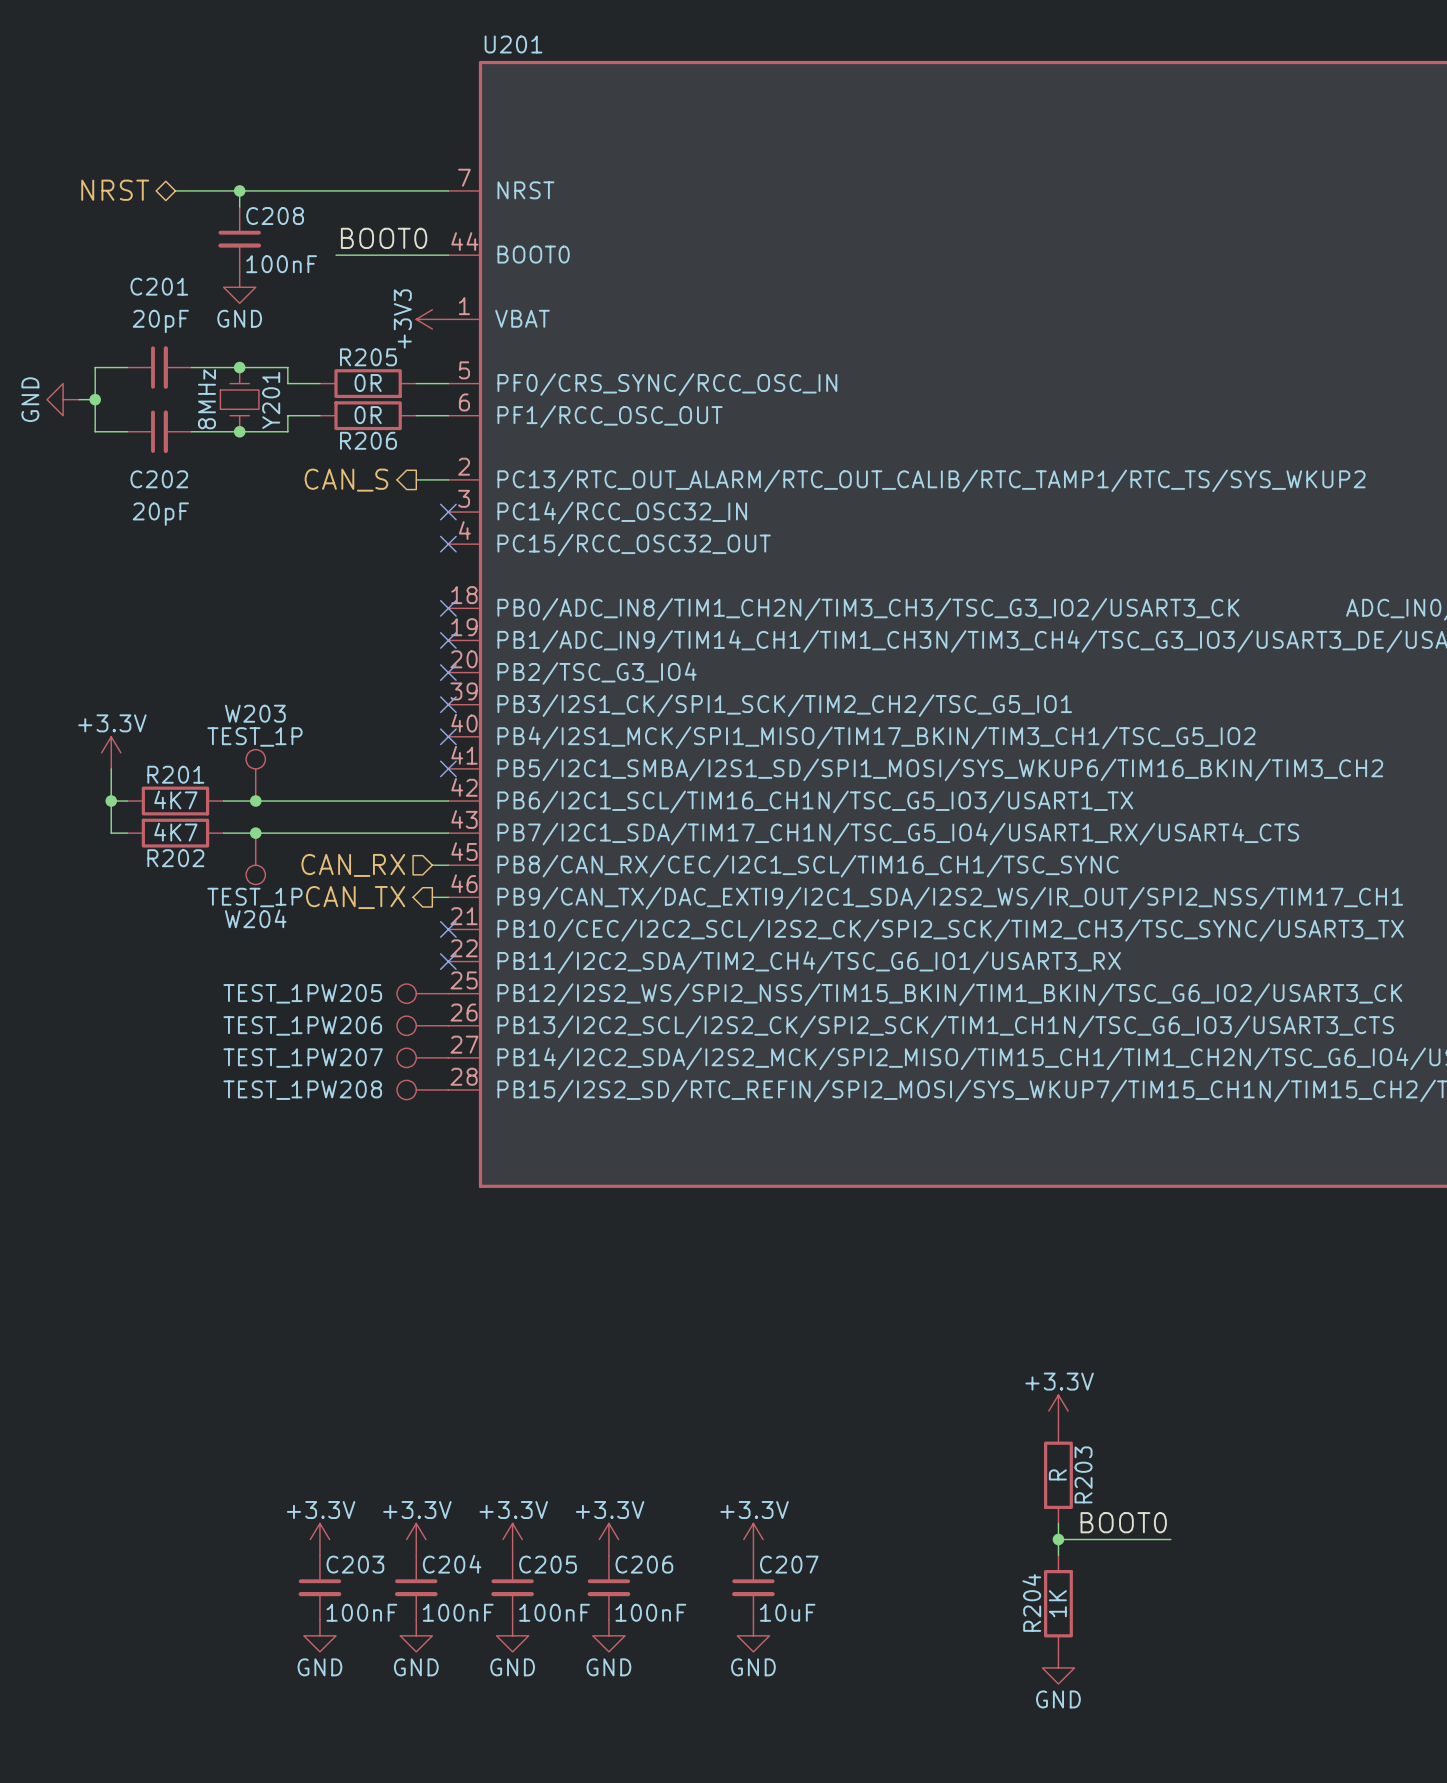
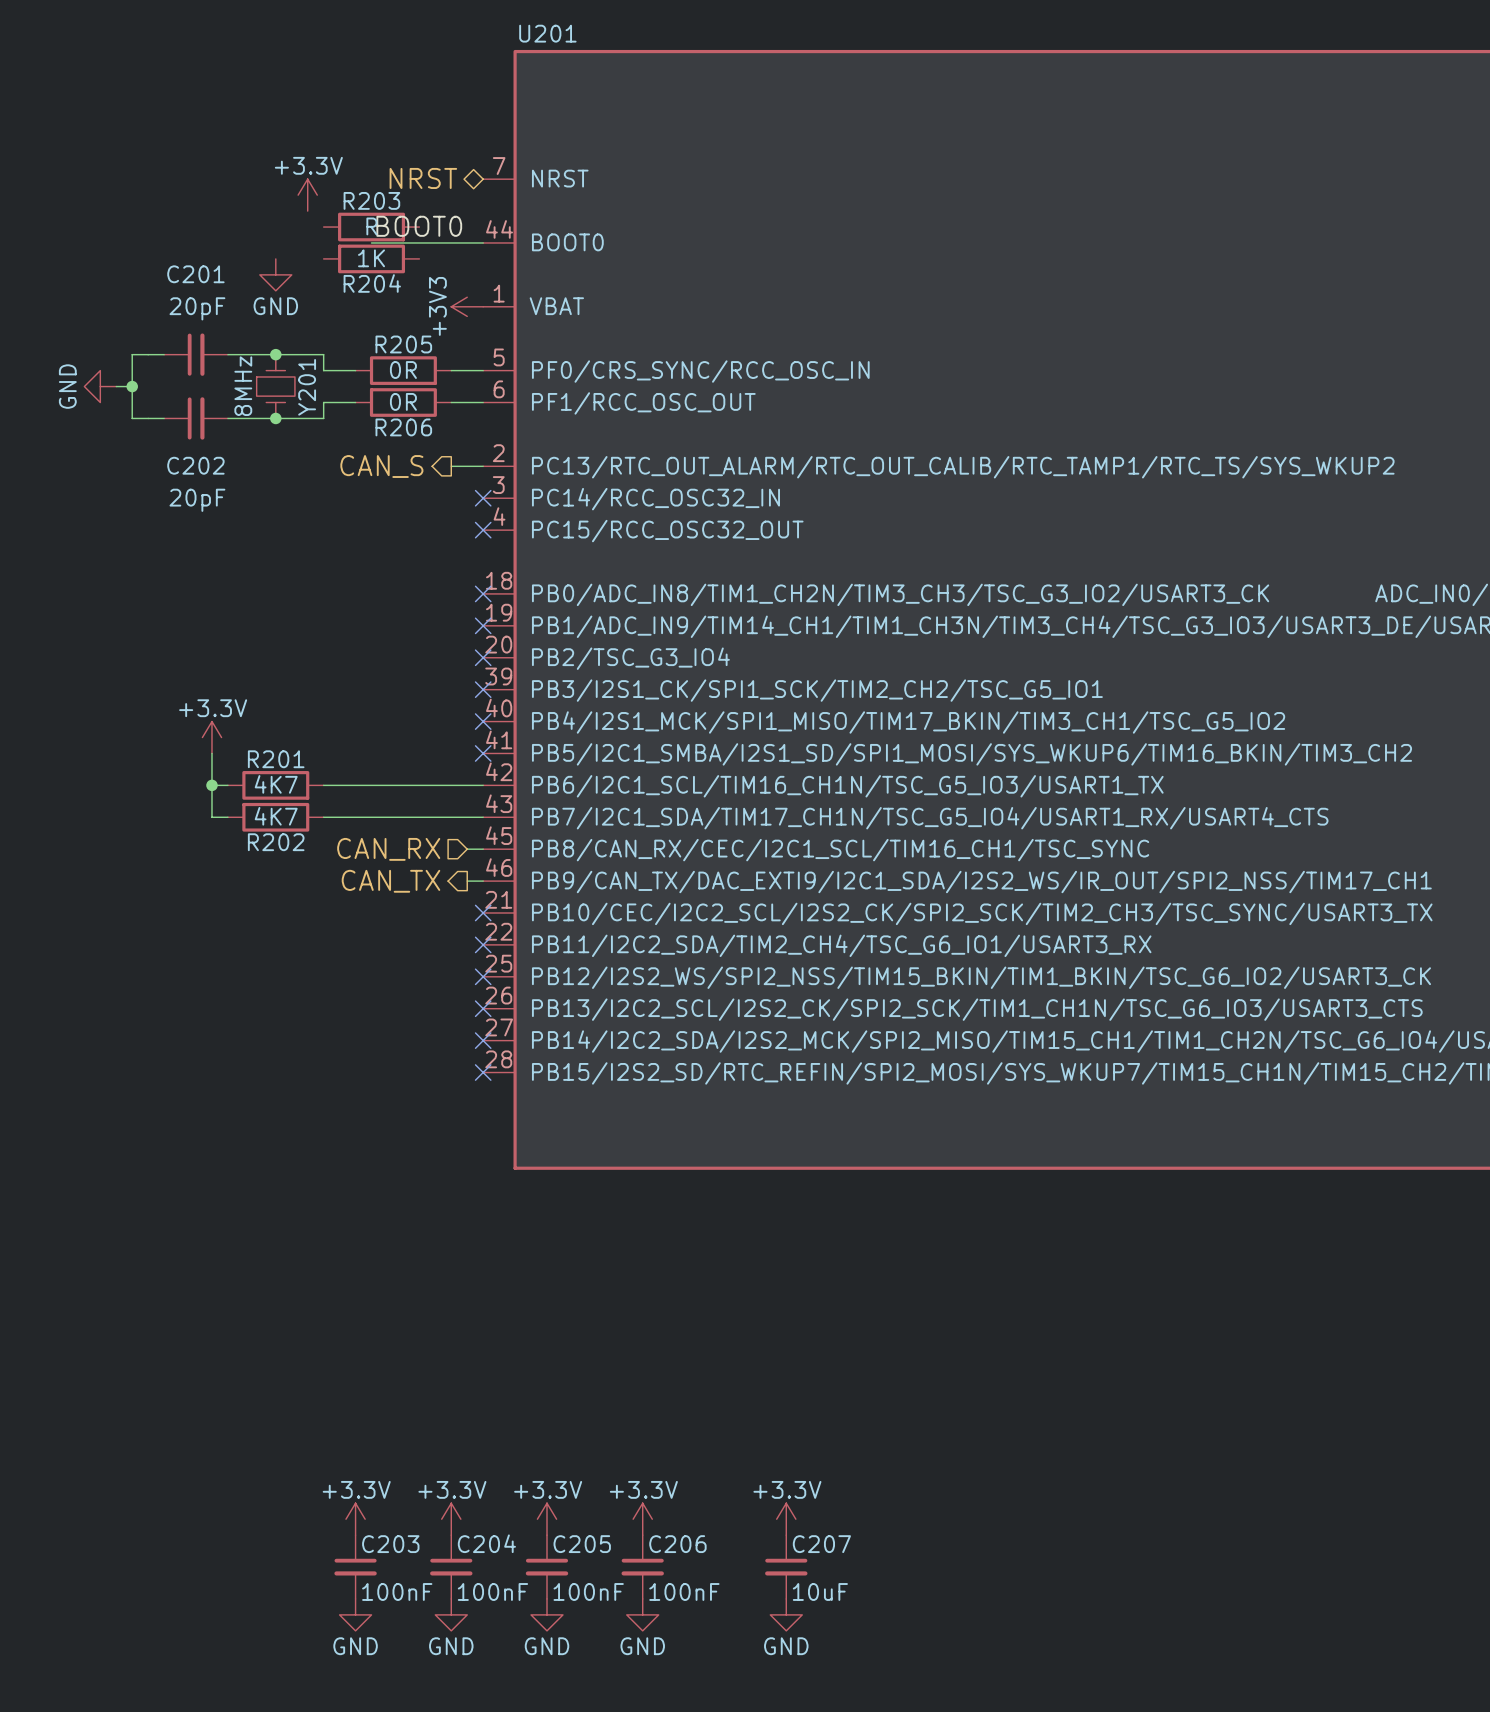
hierarchical label position: NRST (115, 190) -> NRST (423, 178)
wire: (175, 190) (448, 190) -> none
wire: (239, 190) (239, 207) -> none
junction: (239, 190) -> none
power symbol: none -> +3.3V (307, 195)
C208: 100nF (239, 239) -> none
power symbol position: +3.3V (111, 752) -> +3.3V (211, 737)
wire: (111, 768) (111, 833) (127, 833) -> (211, 753) (211, 817) (227, 817)
W203: TEST_1P (255, 775) -> none
wire: (111, 801) (127, 801) -> (211, 785) (227, 785)
junction: (111, 801) -> none
R201 position: (175, 801) -> (275, 785)
junction: none -> (211, 785)
wire: (223, 801) (287, 801) -> none
junction: (255, 801) -> none
R202 position: (175, 833) -> (275, 817)
wire: (223, 833) (287, 833) -> none
junction: (255, 833) -> none
W204: TEST_1P (255, 858) -> none
W205: TEST_1P (422, 993) -> none
no-connect mark: none -> (483, 976)
W206: TEST_1P (422, 1025) -> none
no-connect mark: none -> (483, 1008)
W207: TEST_1P (422, 1057) -> none
no-connect mark: none -> (483, 1040)
W208: TEST_1P (422, 1089) -> none
no-connect mark: none -> (483, 1072)
power symbol: +3.3V (1058, 1411) -> none
R203 name position: R203 (1083, 1474) -> R203 (371, 200)
R203 rotation: 0° (1058, 1475) -> 90° clockwise (371, 227)
R203 position: (1058, 1475) -> (371, 227)
label: BOOT0 (1123, 1522) -> none
wire: (1058, 1523) (1058, 1555) -> none
wire: (1058, 1539) (1170, 1539) -> none
junction: (1058, 1539) -> none
R204 name position: R204 (1031, 1602) -> R204 (372, 283)
R204 rotation: 0° (1058, 1603) -> 90° clockwise (371, 258)
R204 position: (1058, 1603) -> (371, 258)
power symbol: GND (1058, 1667) -> none

